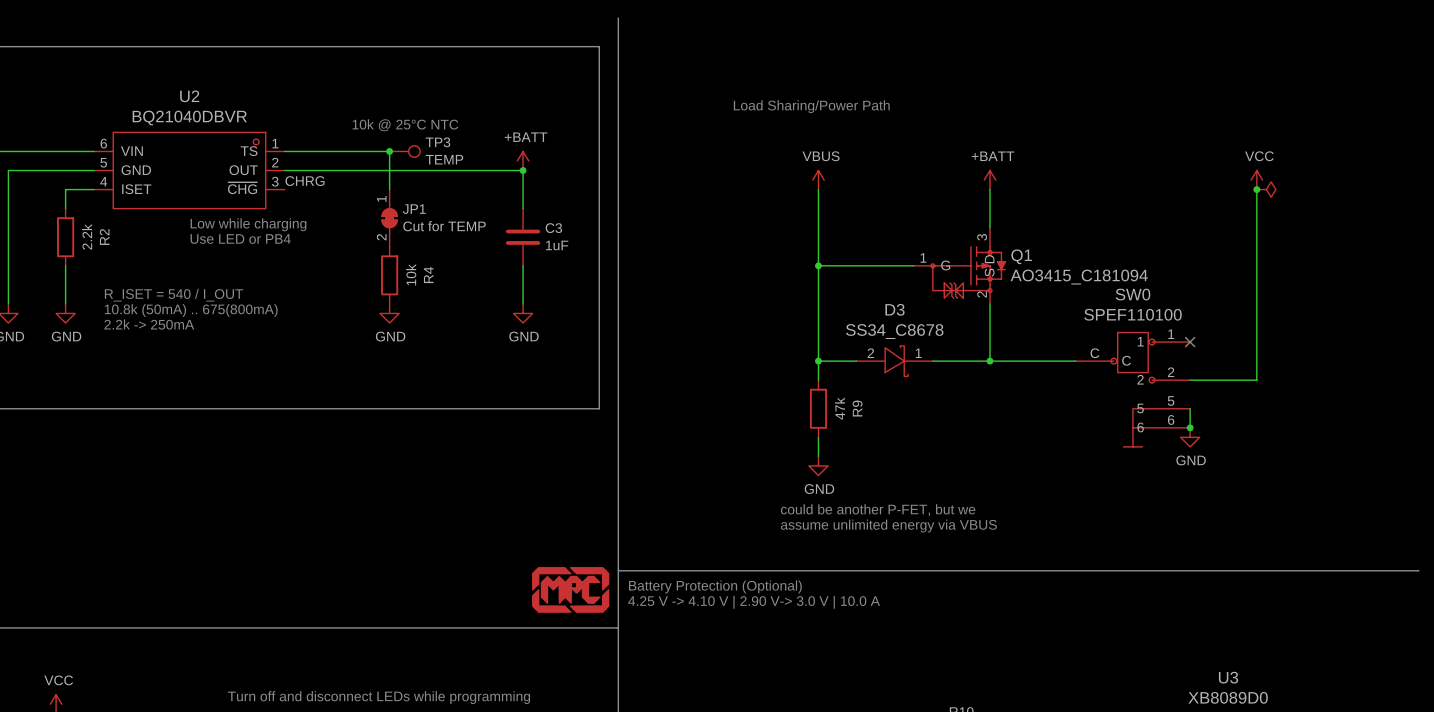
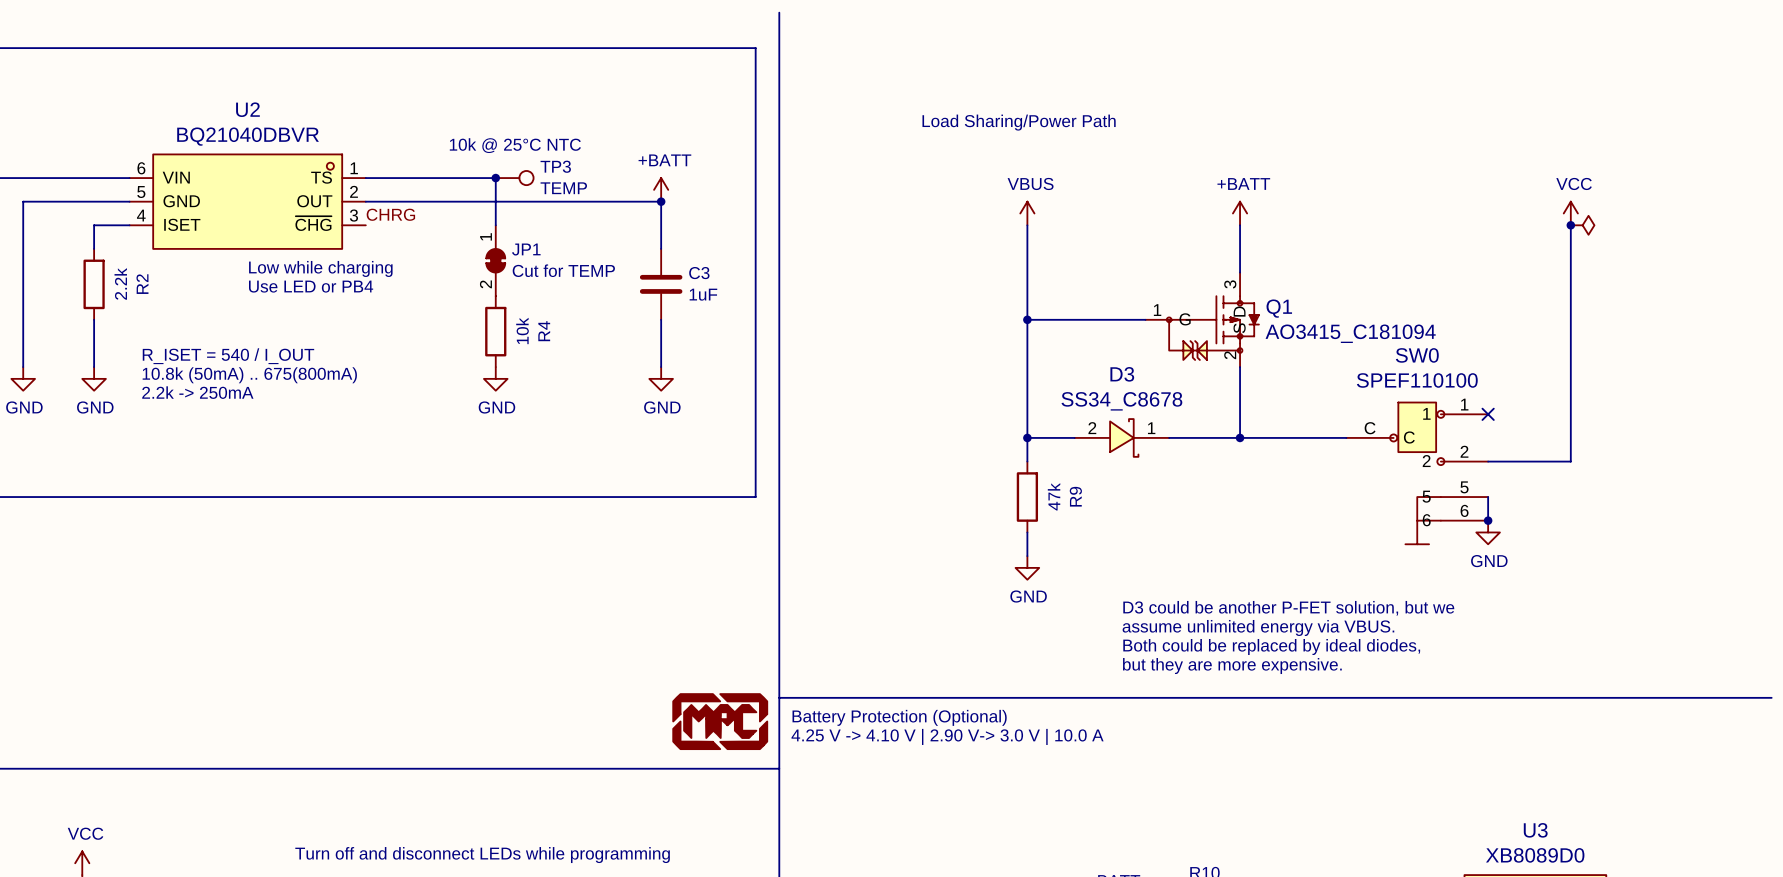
text: could be another P-FET, but we (878, 510) -> D3 could be another P-FET solution, but we (1288, 608)
text: assume unlimited energy via VBUS (888, 526) -> assume unlimited energy via VBUS. (1258, 627)
text: none -> Both could be replaced by ideal diodes, (1271, 646)
text: none -> but they are more expensive. (1232, 666)

